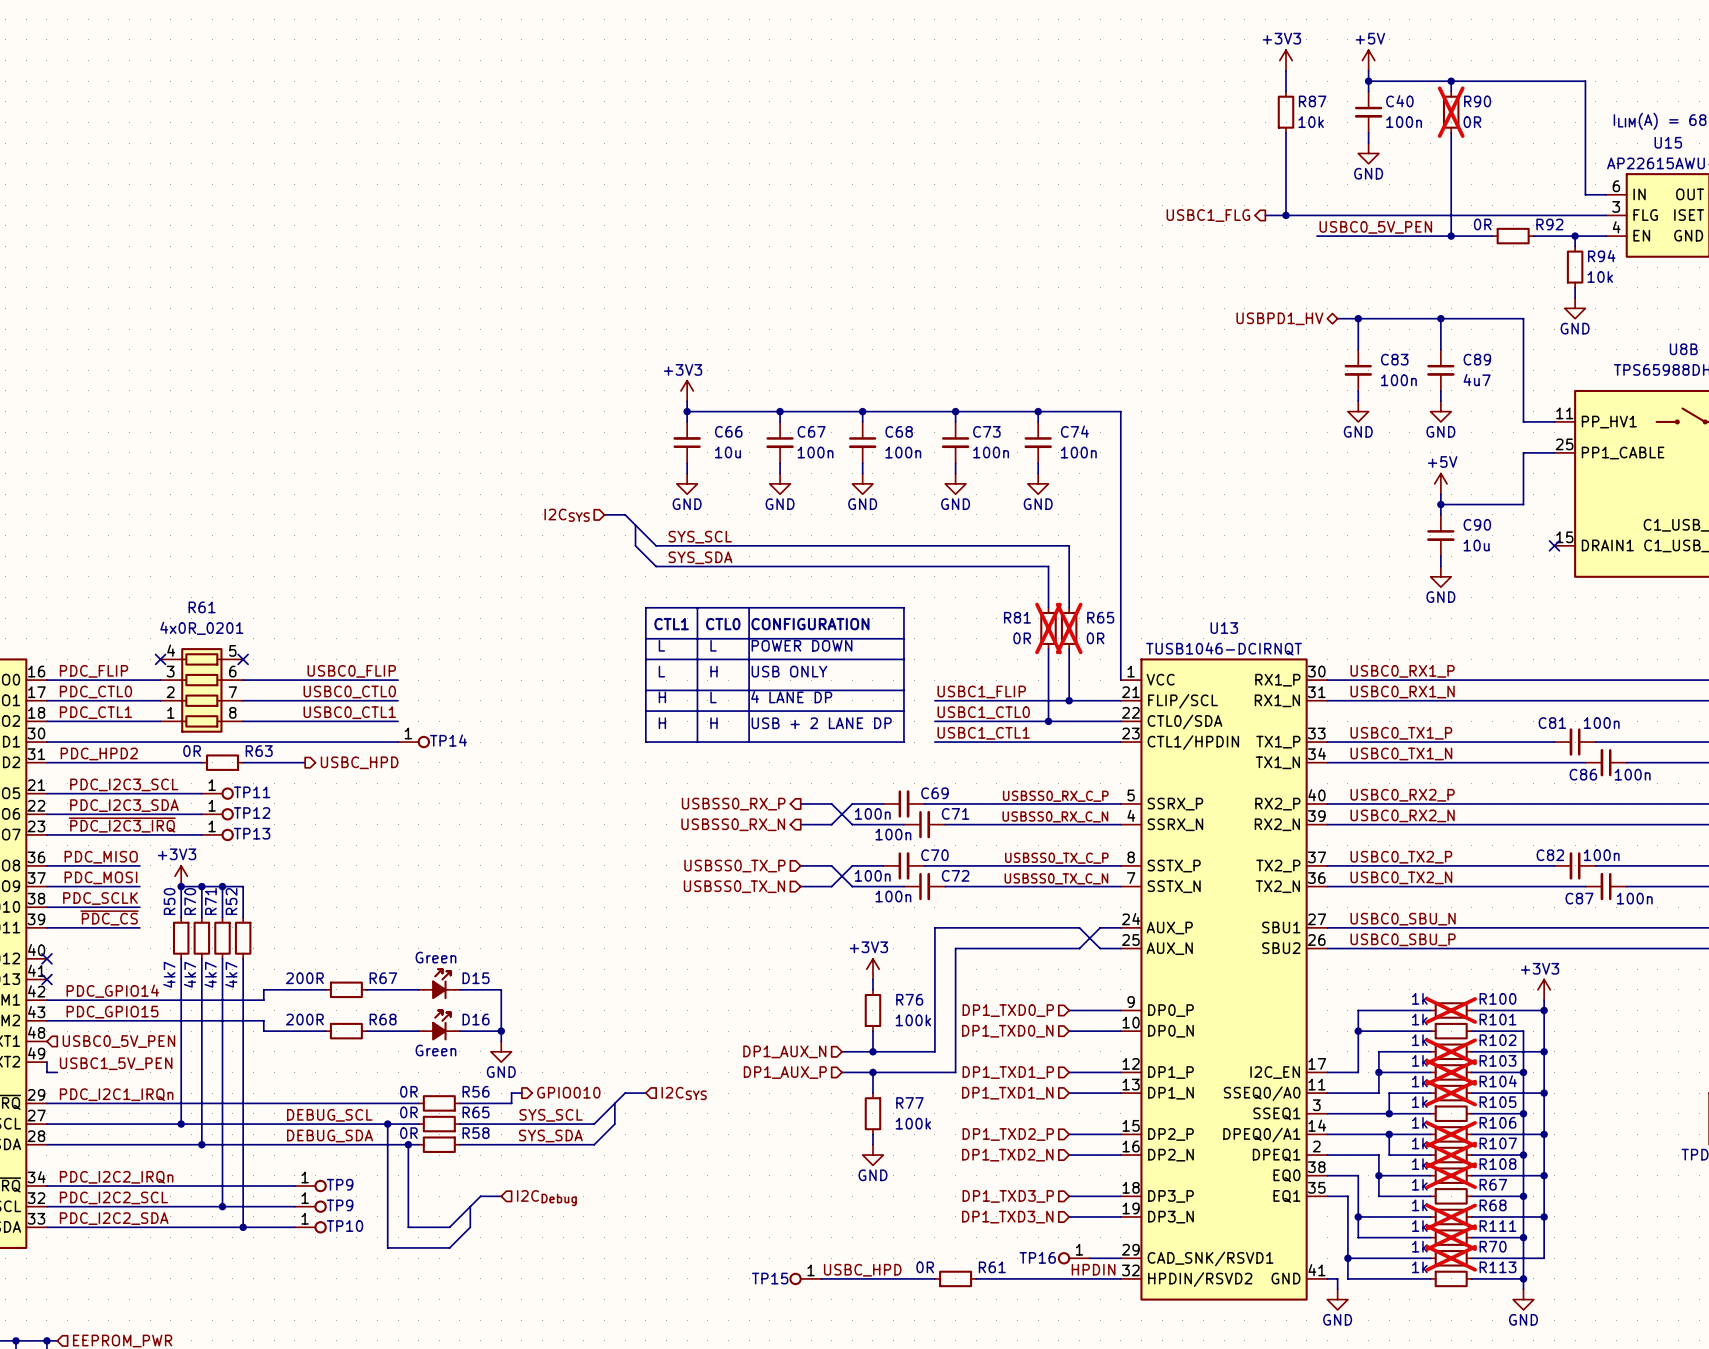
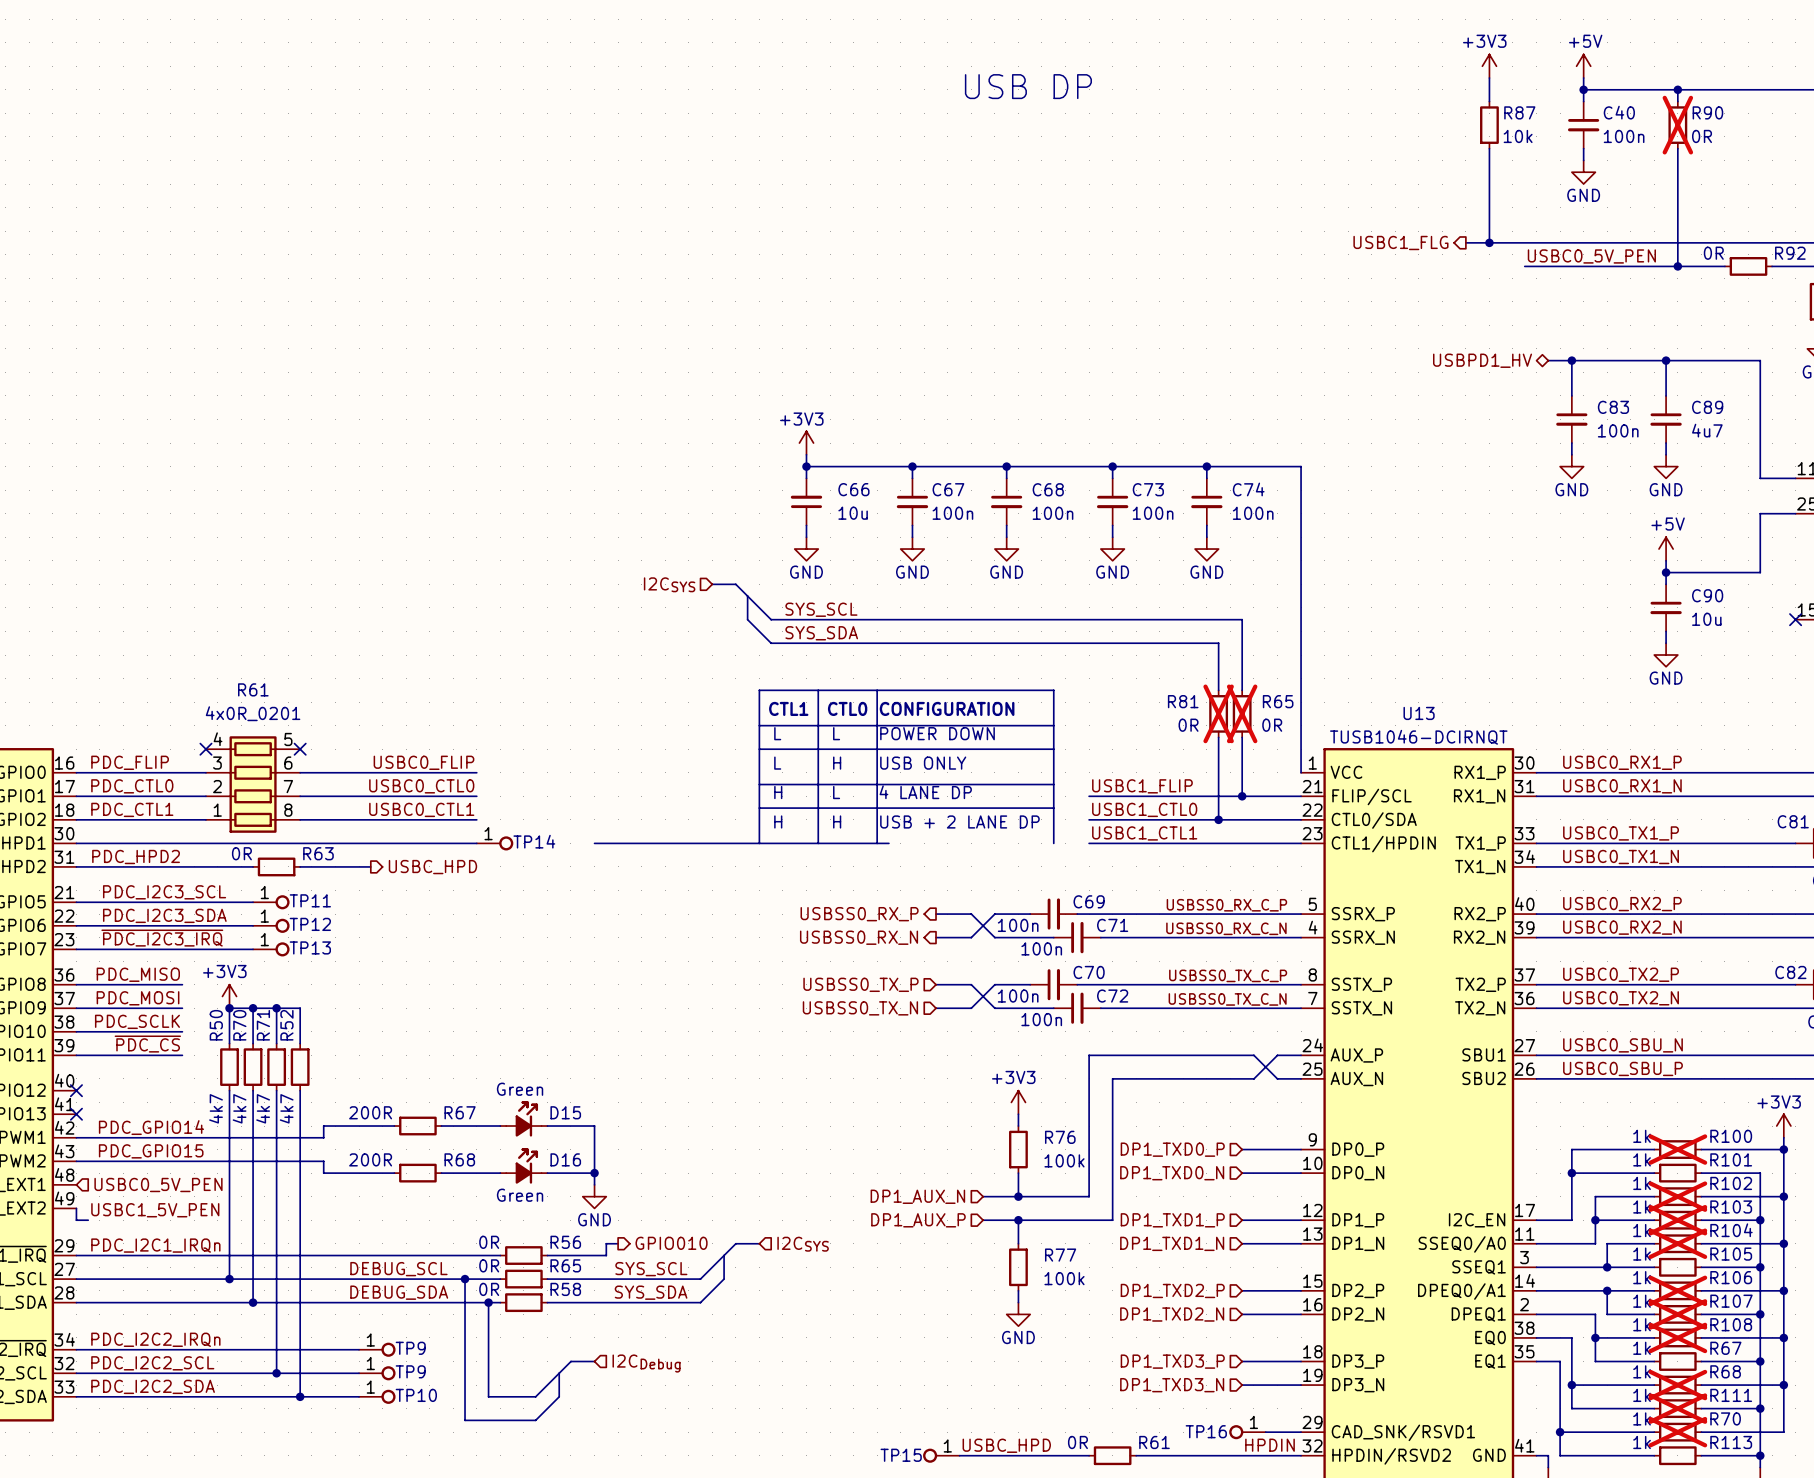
text: none -> USB DP (1028, 86)
line: none -> (594, 843) (759, 843)
line: (759, 742) (903, 742) -> none

